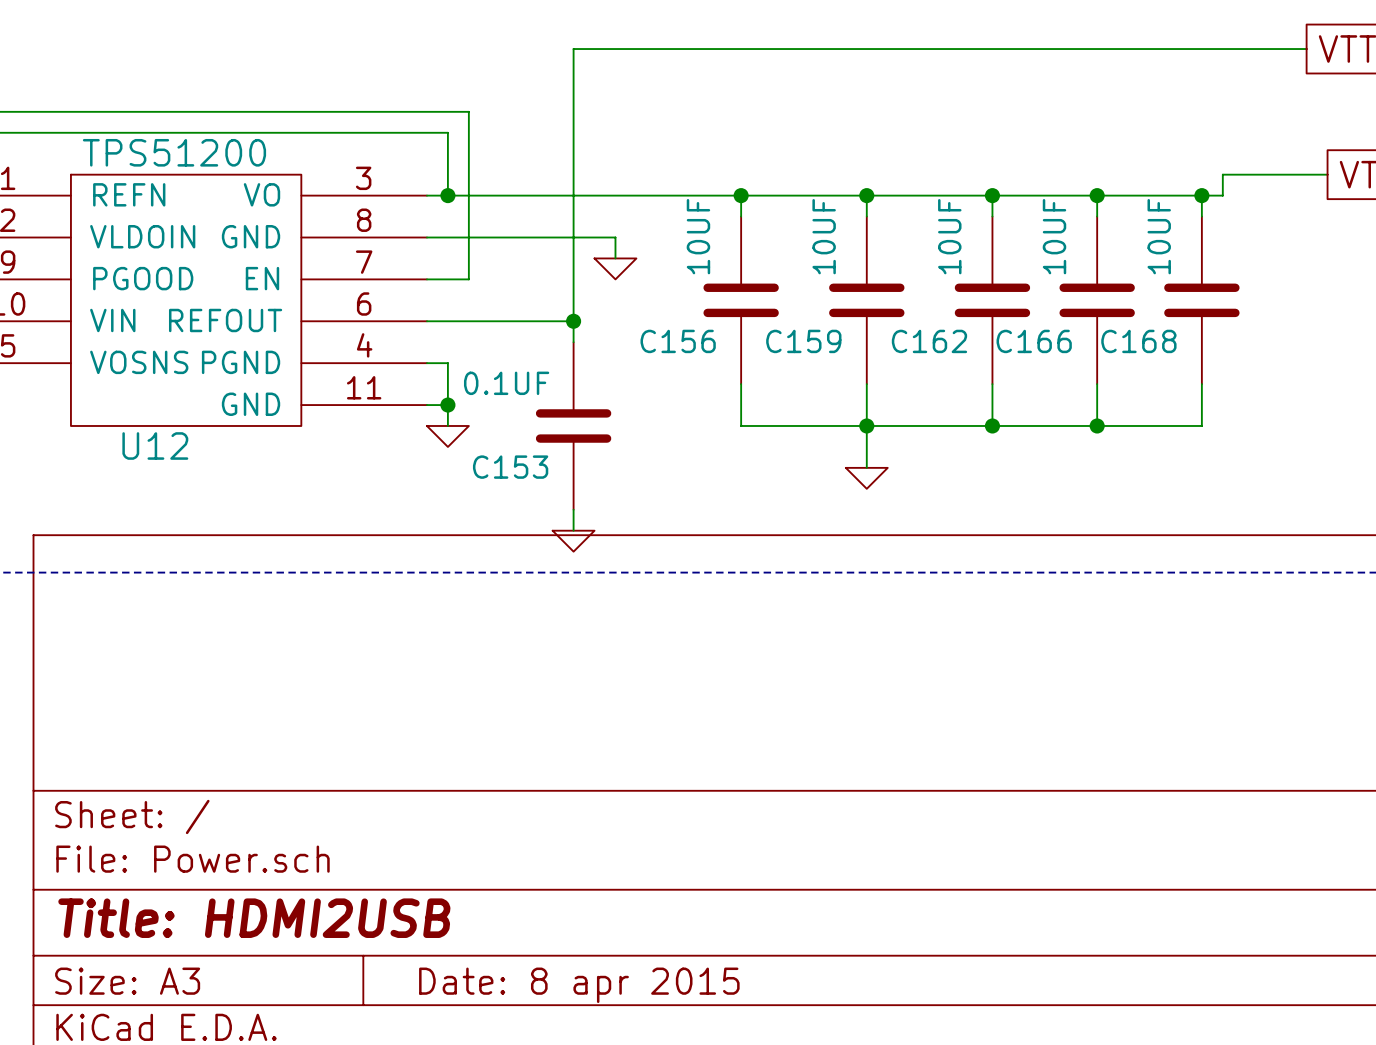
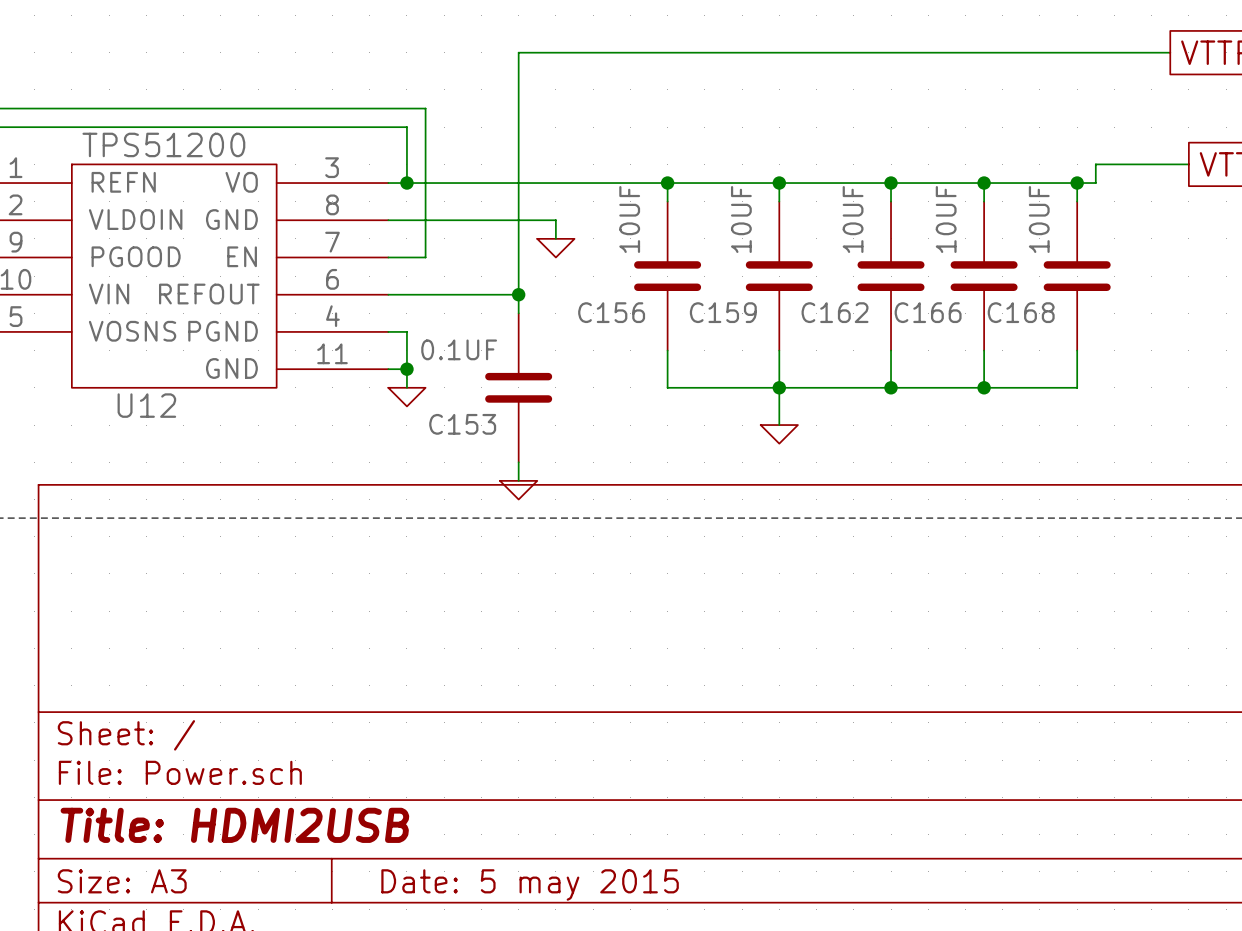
title block: Date: 8 apr 2015 (579, 985) -> Date: 5 may 2015 (530, 884)

